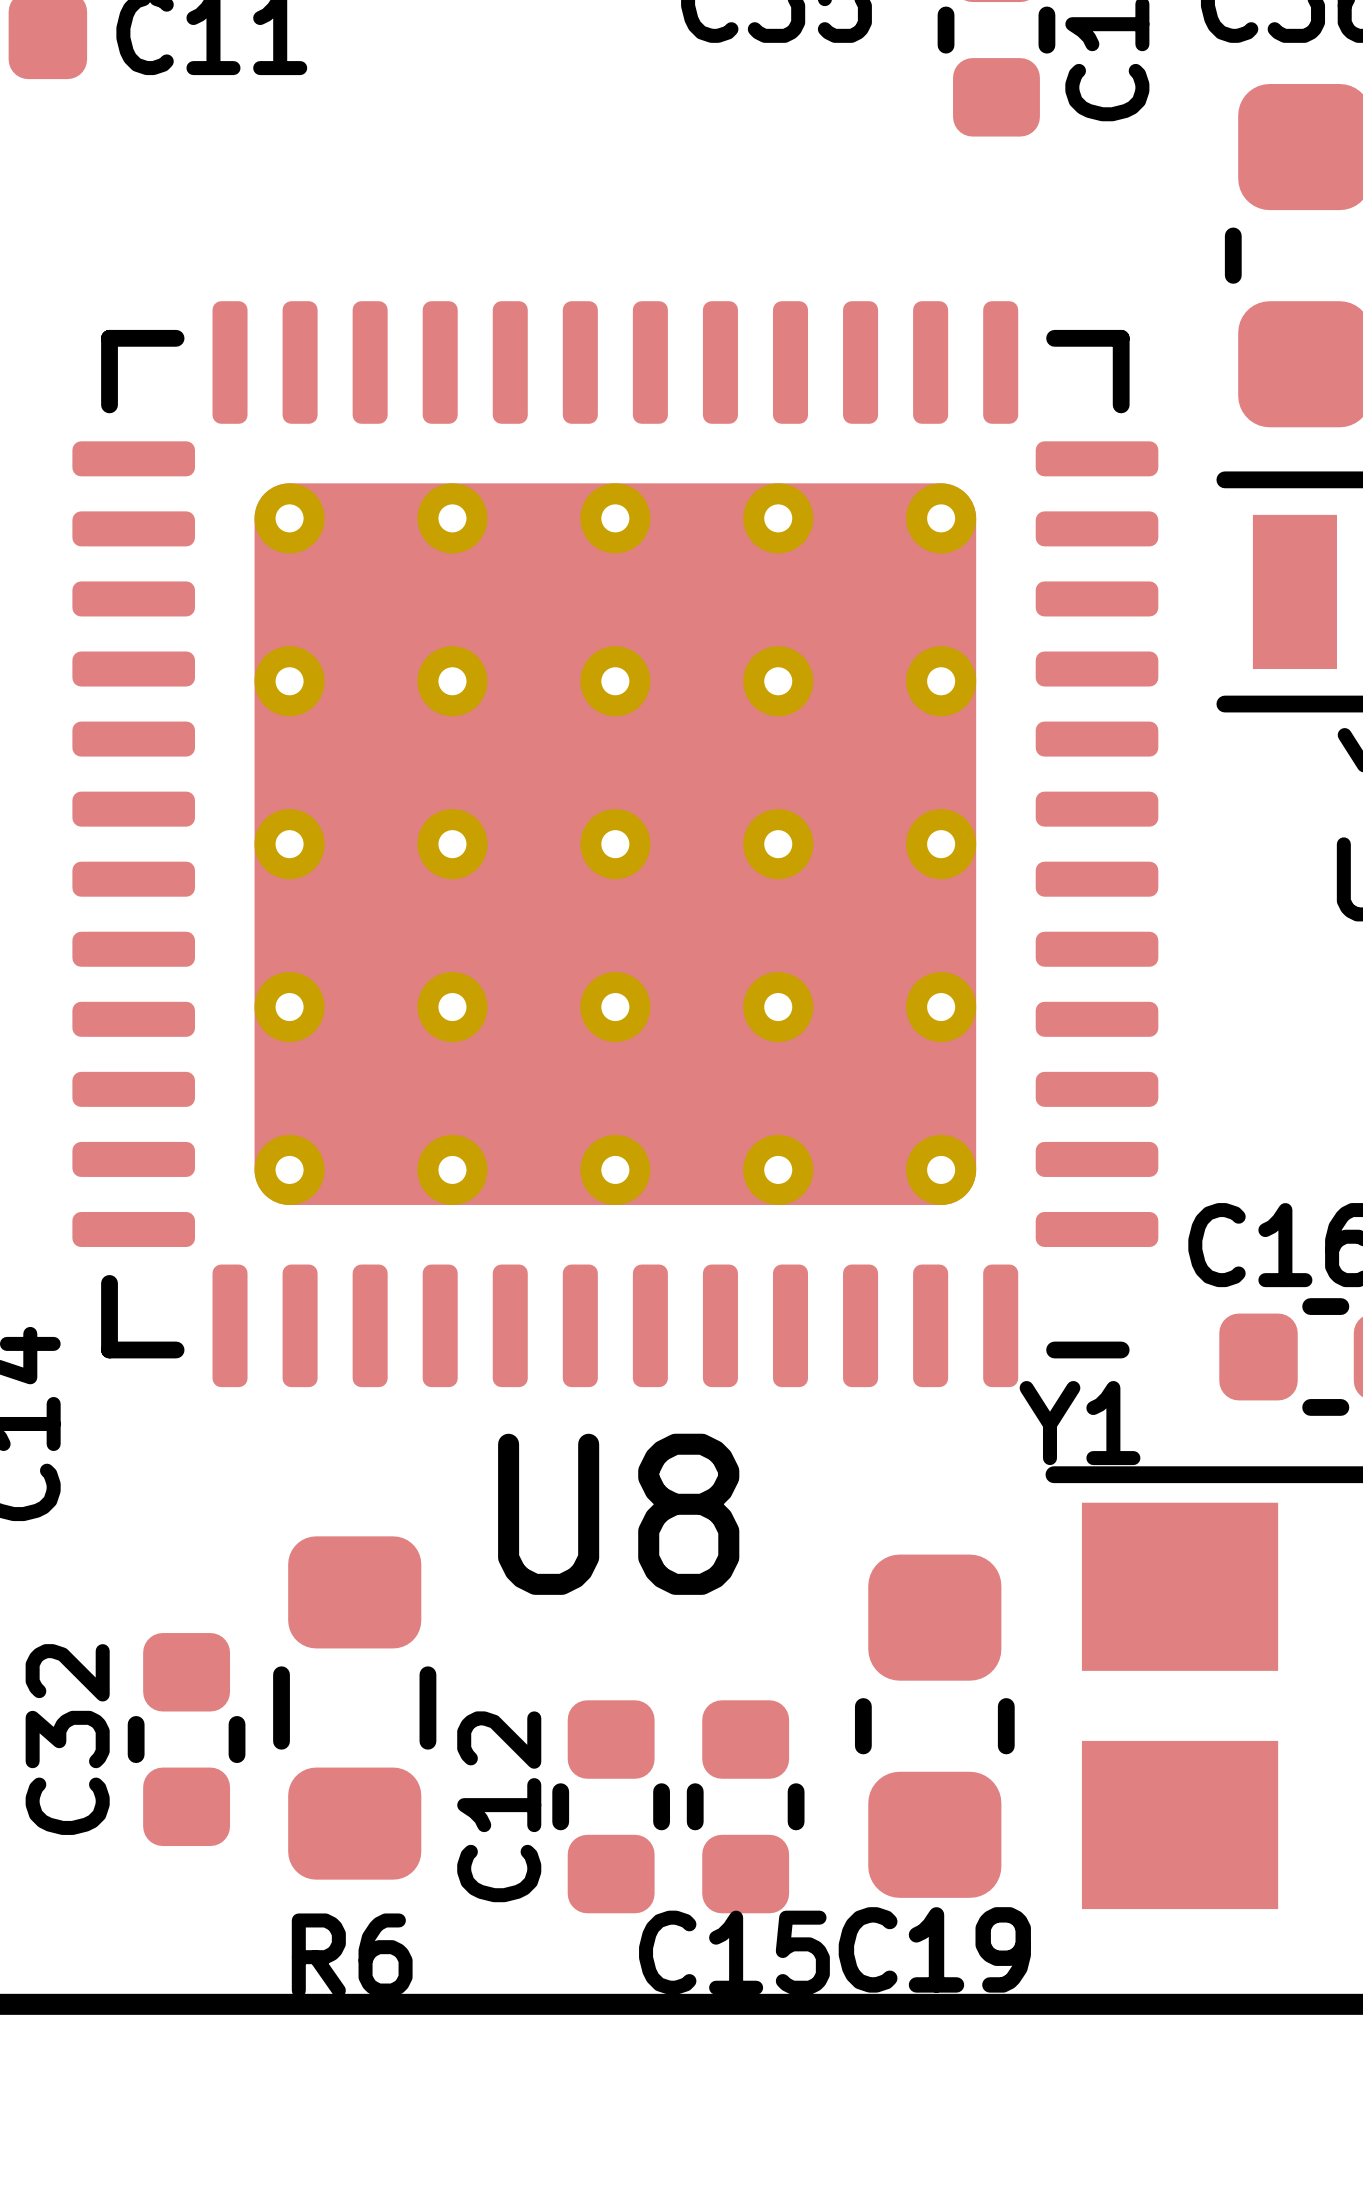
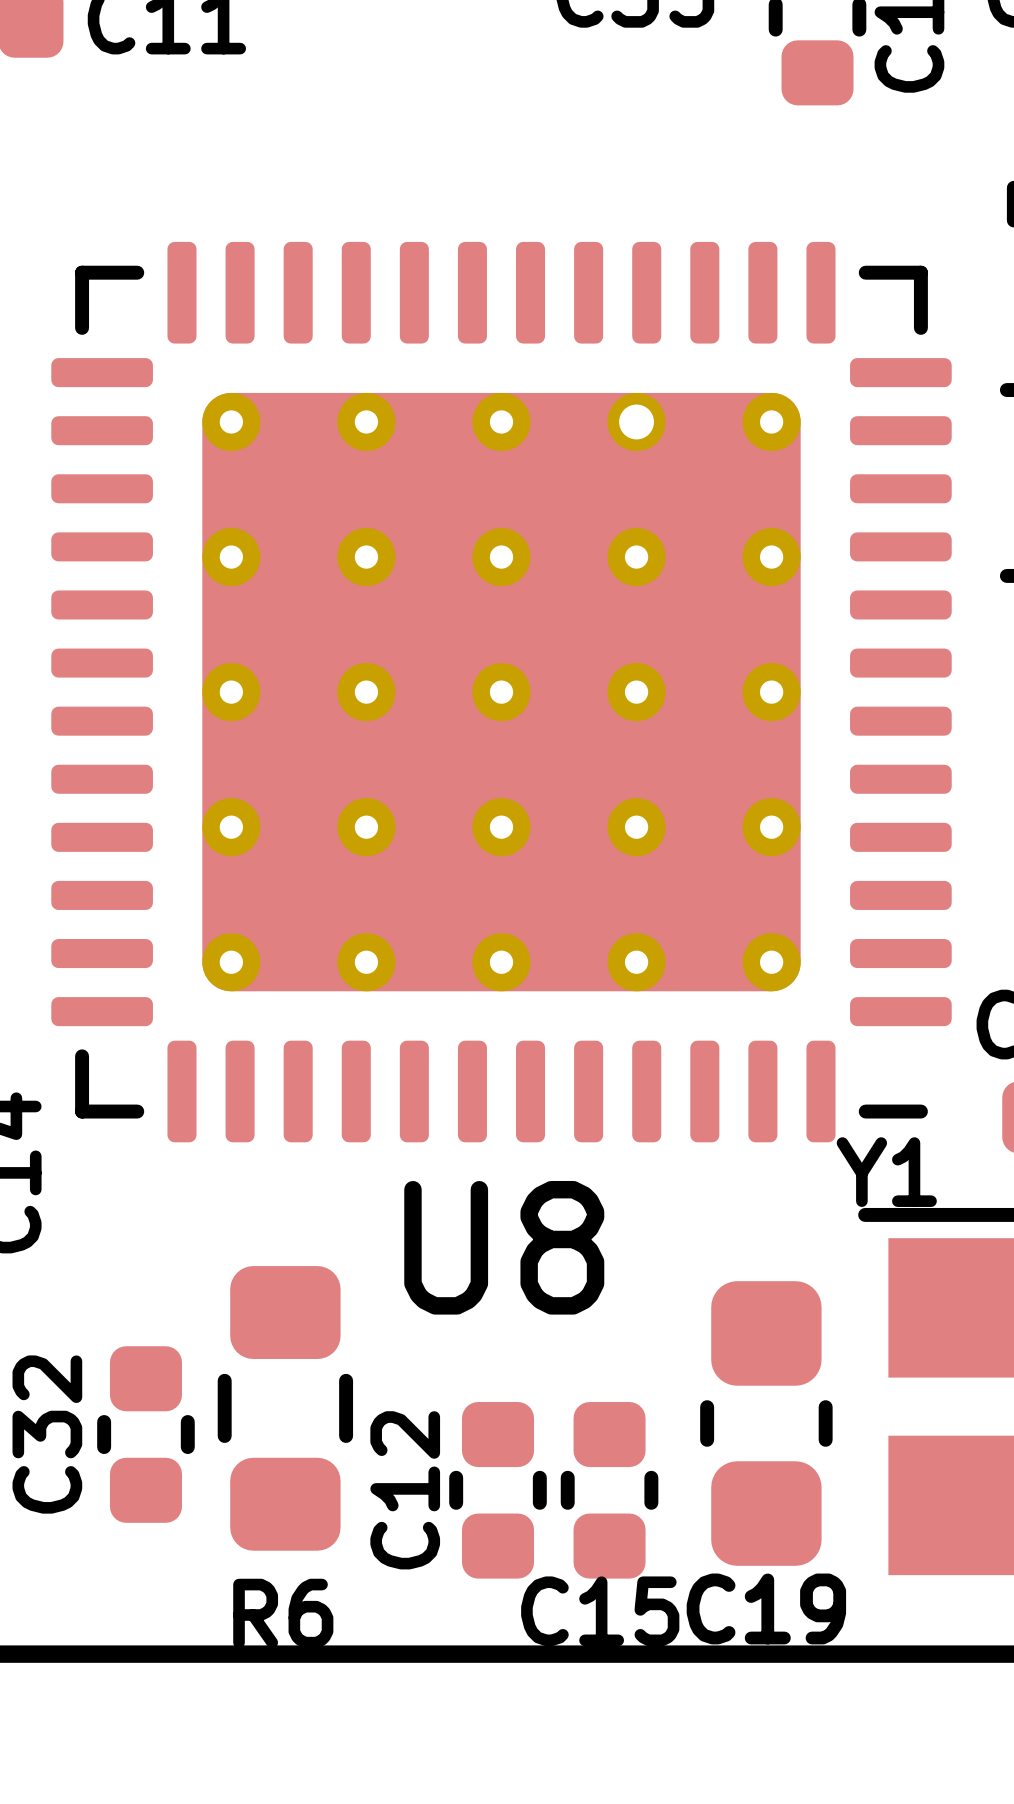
U8 footprint: [72, 301, 1159, 1388] -> [51, 241, 952, 1143]

